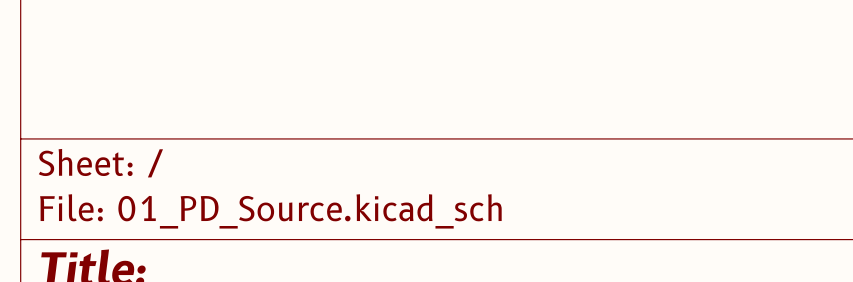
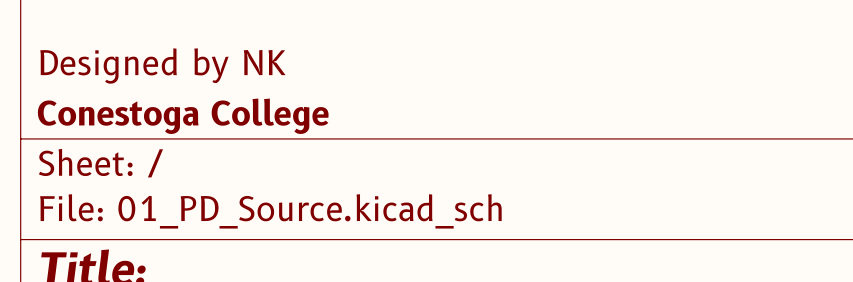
title block: none -> Designed by NK (162, 66)
title block: none -> Conestoga College (183, 116)

